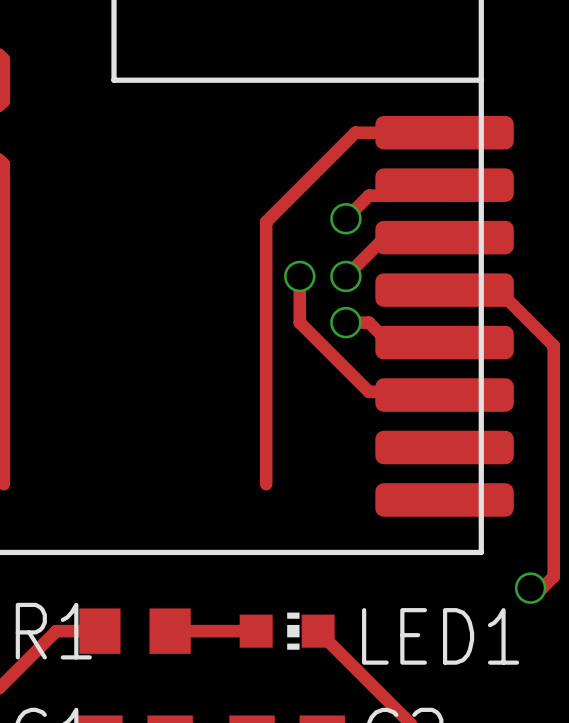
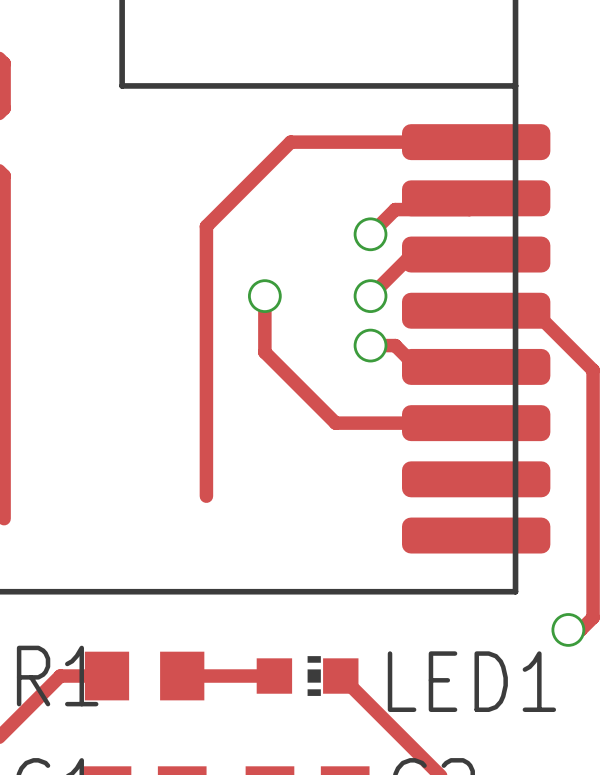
track: (355, 132) (266, 221) (266, 484) -> (380, 142) (290, 142) (206, 226) (206, 496)
track: none -> (264, 296) (264, 352) (335, 423) (476, 423)
track: (299, 276) (299, 322) (369, 391) (438, 391) -> none
via position: (299, 276) -> (264, 296)

